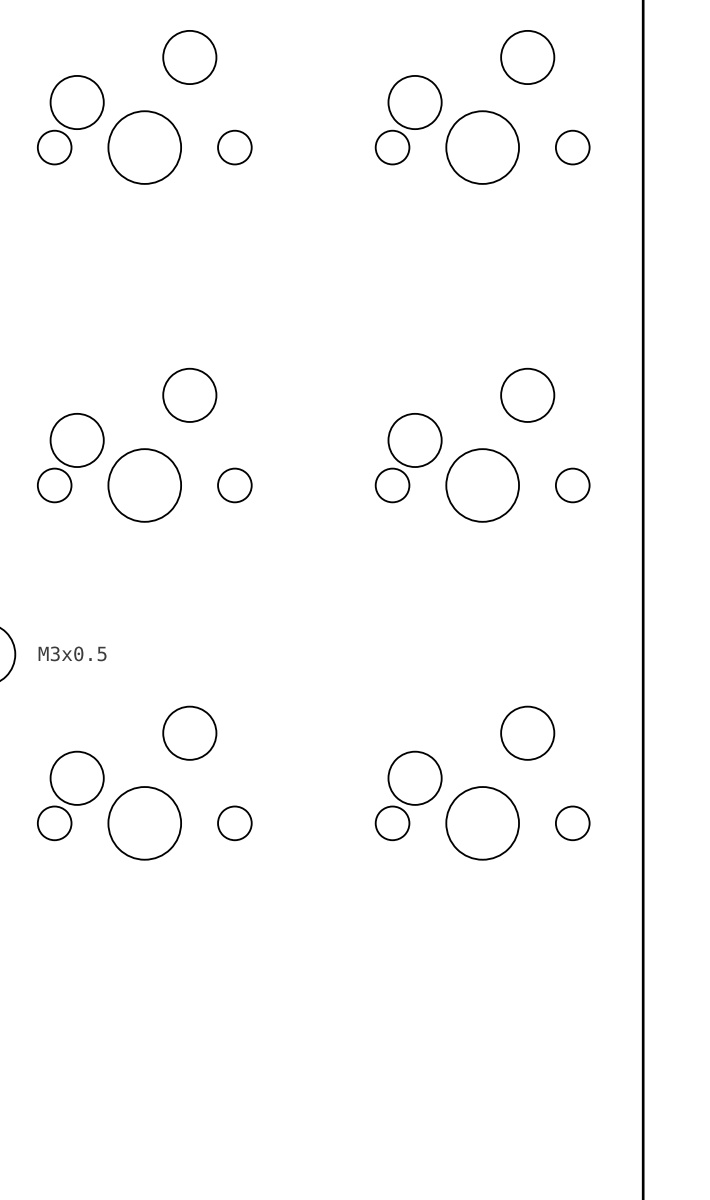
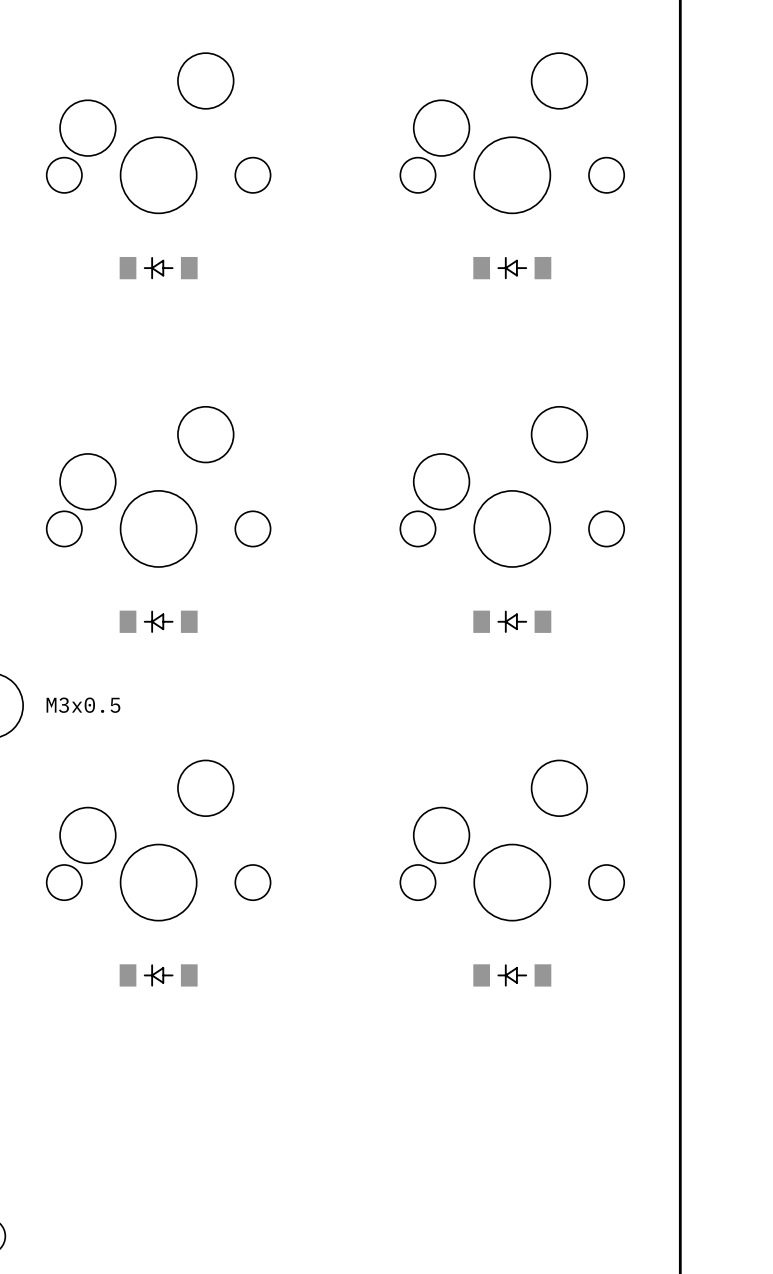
part: none -> (158, 268)
part: none -> (512, 268)
part: none -> (158, 621)
part: none -> (512, 621)
part: none -> (158, 975)
part: none -> (512, 975)

